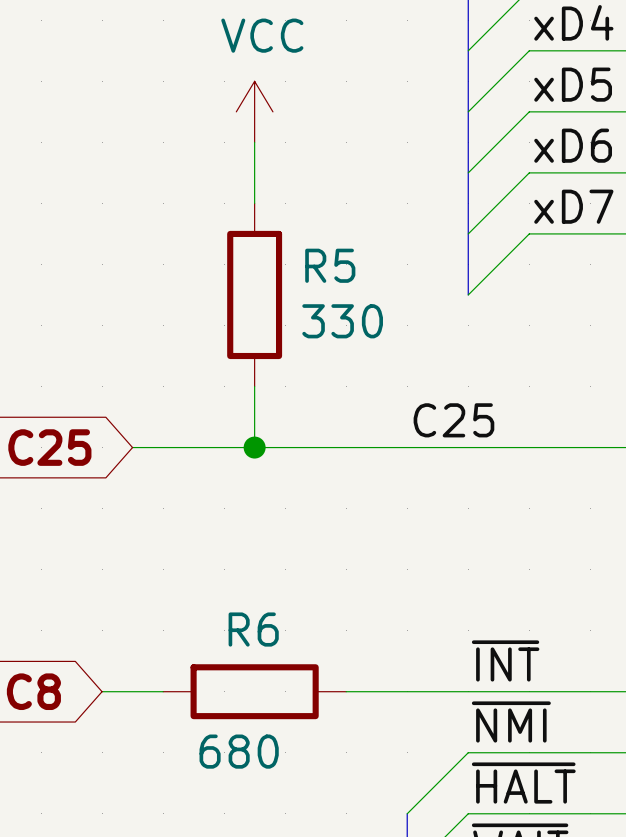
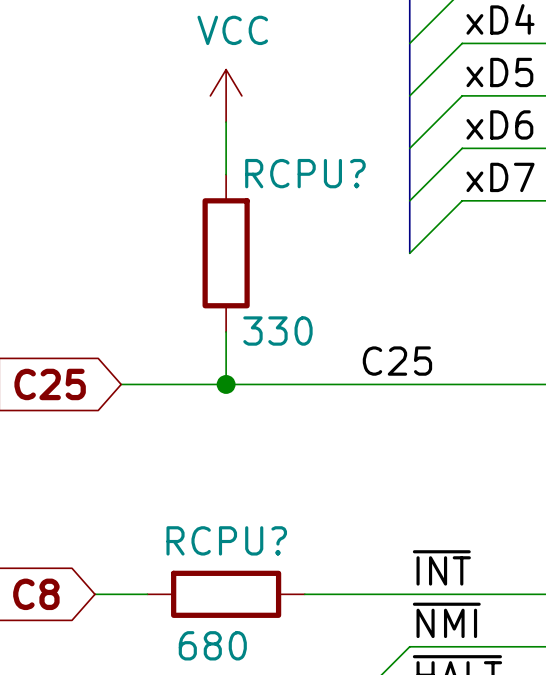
R5 name: R5 (330, 265) -> RCPU? (305, 173)
R5 value position: 330 (342, 321) -> 330 (277, 331)
R6 name: R6 (253, 629) -> RCPU? (226, 540)

